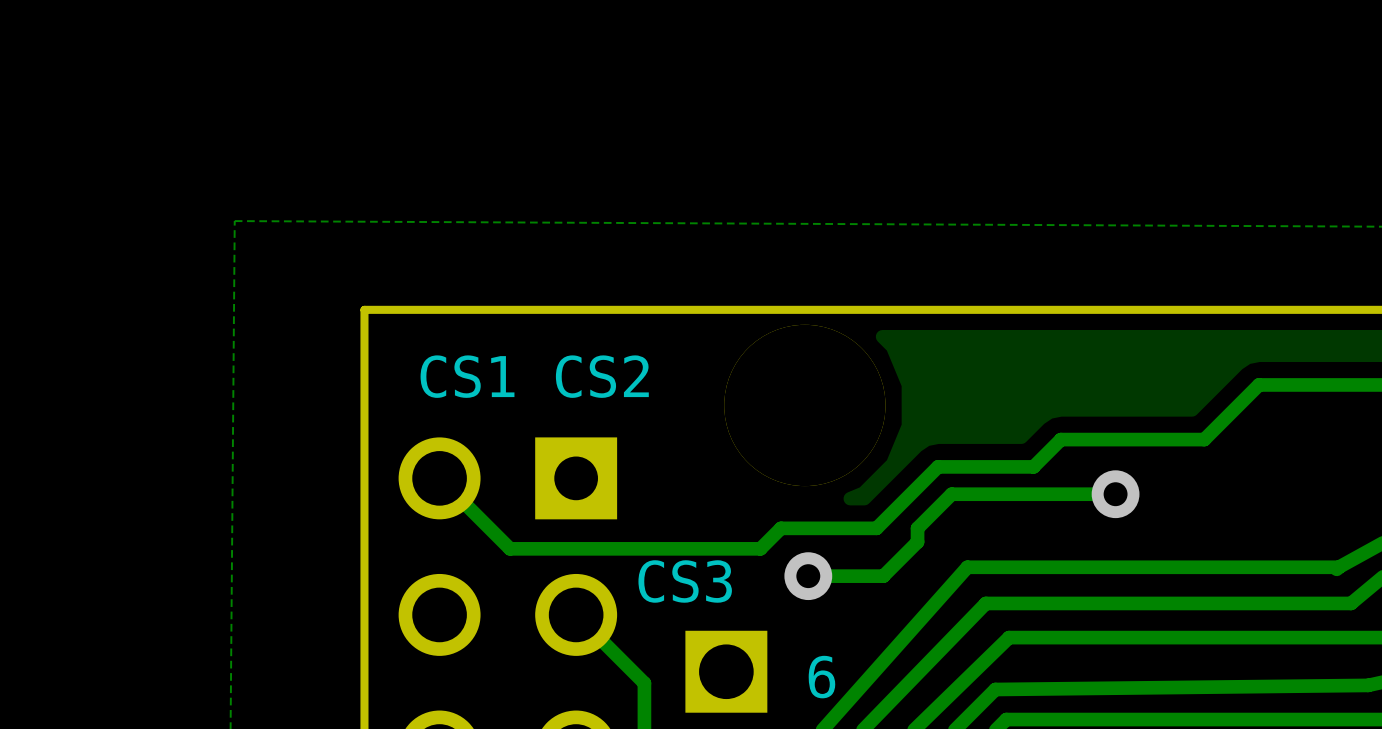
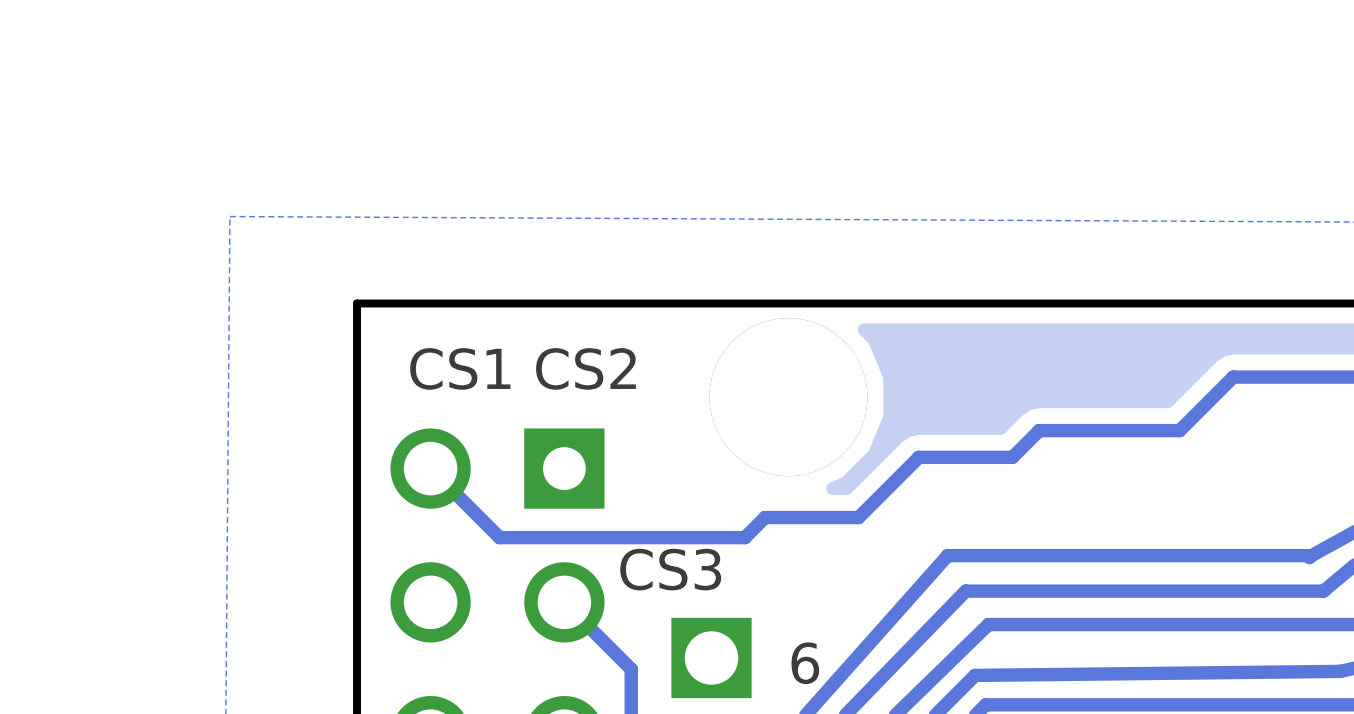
track: (1115, 494) (951, 494) (917, 528) (917, 542) (883, 576) (808, 576) -> none
via: (1115, 494) -> none
via: (808, 576) -> none

